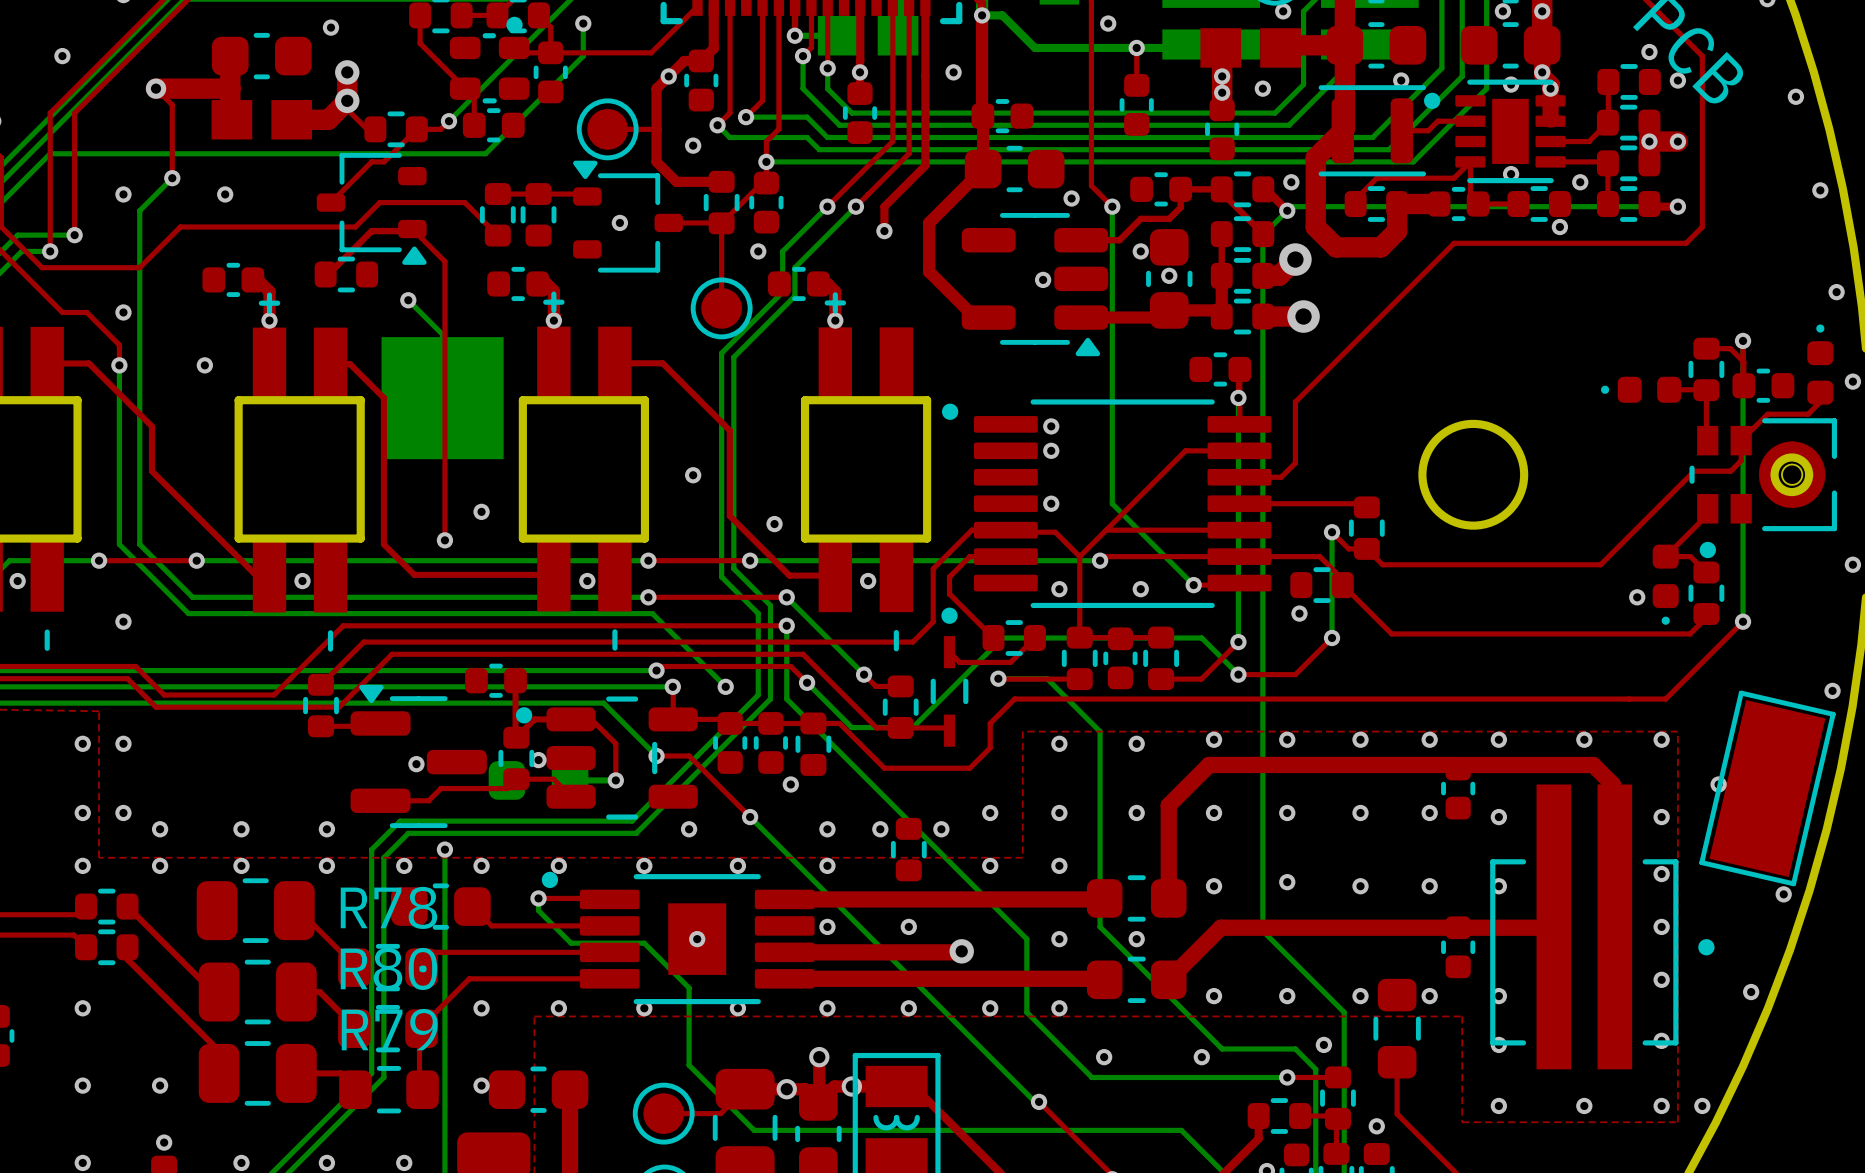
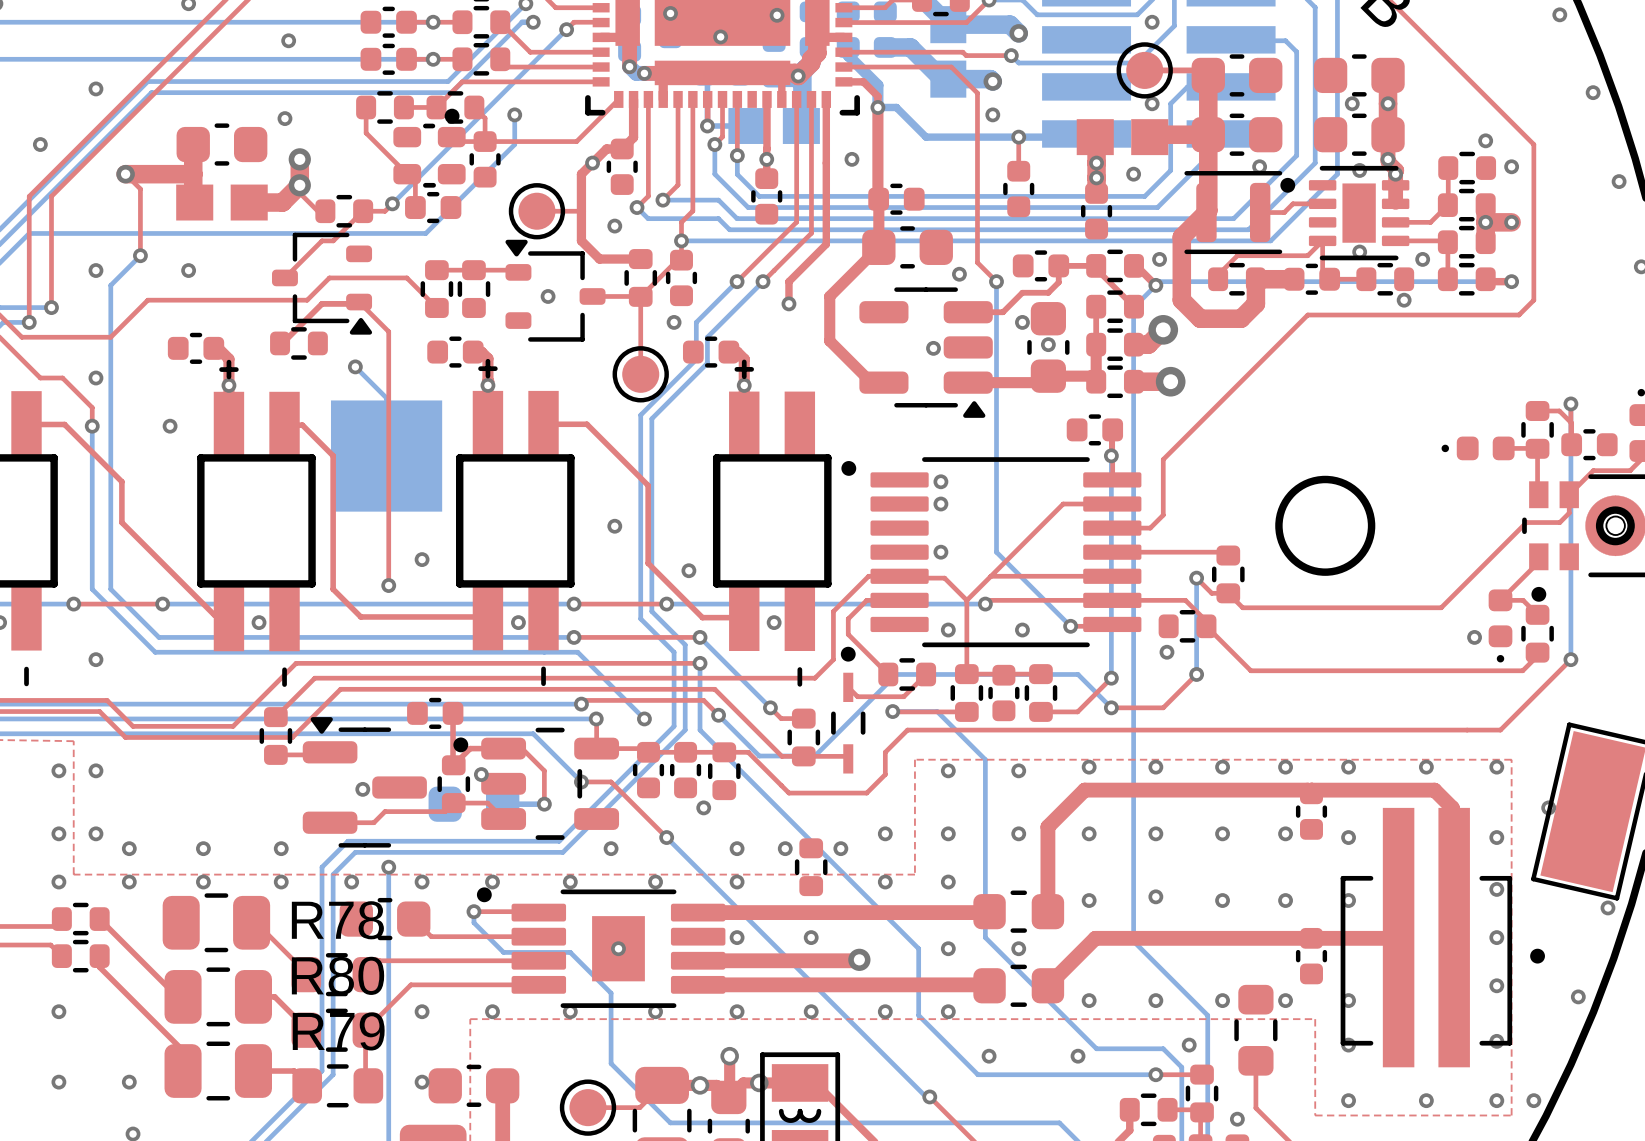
via position: (538, 760) -> (481, 774)

